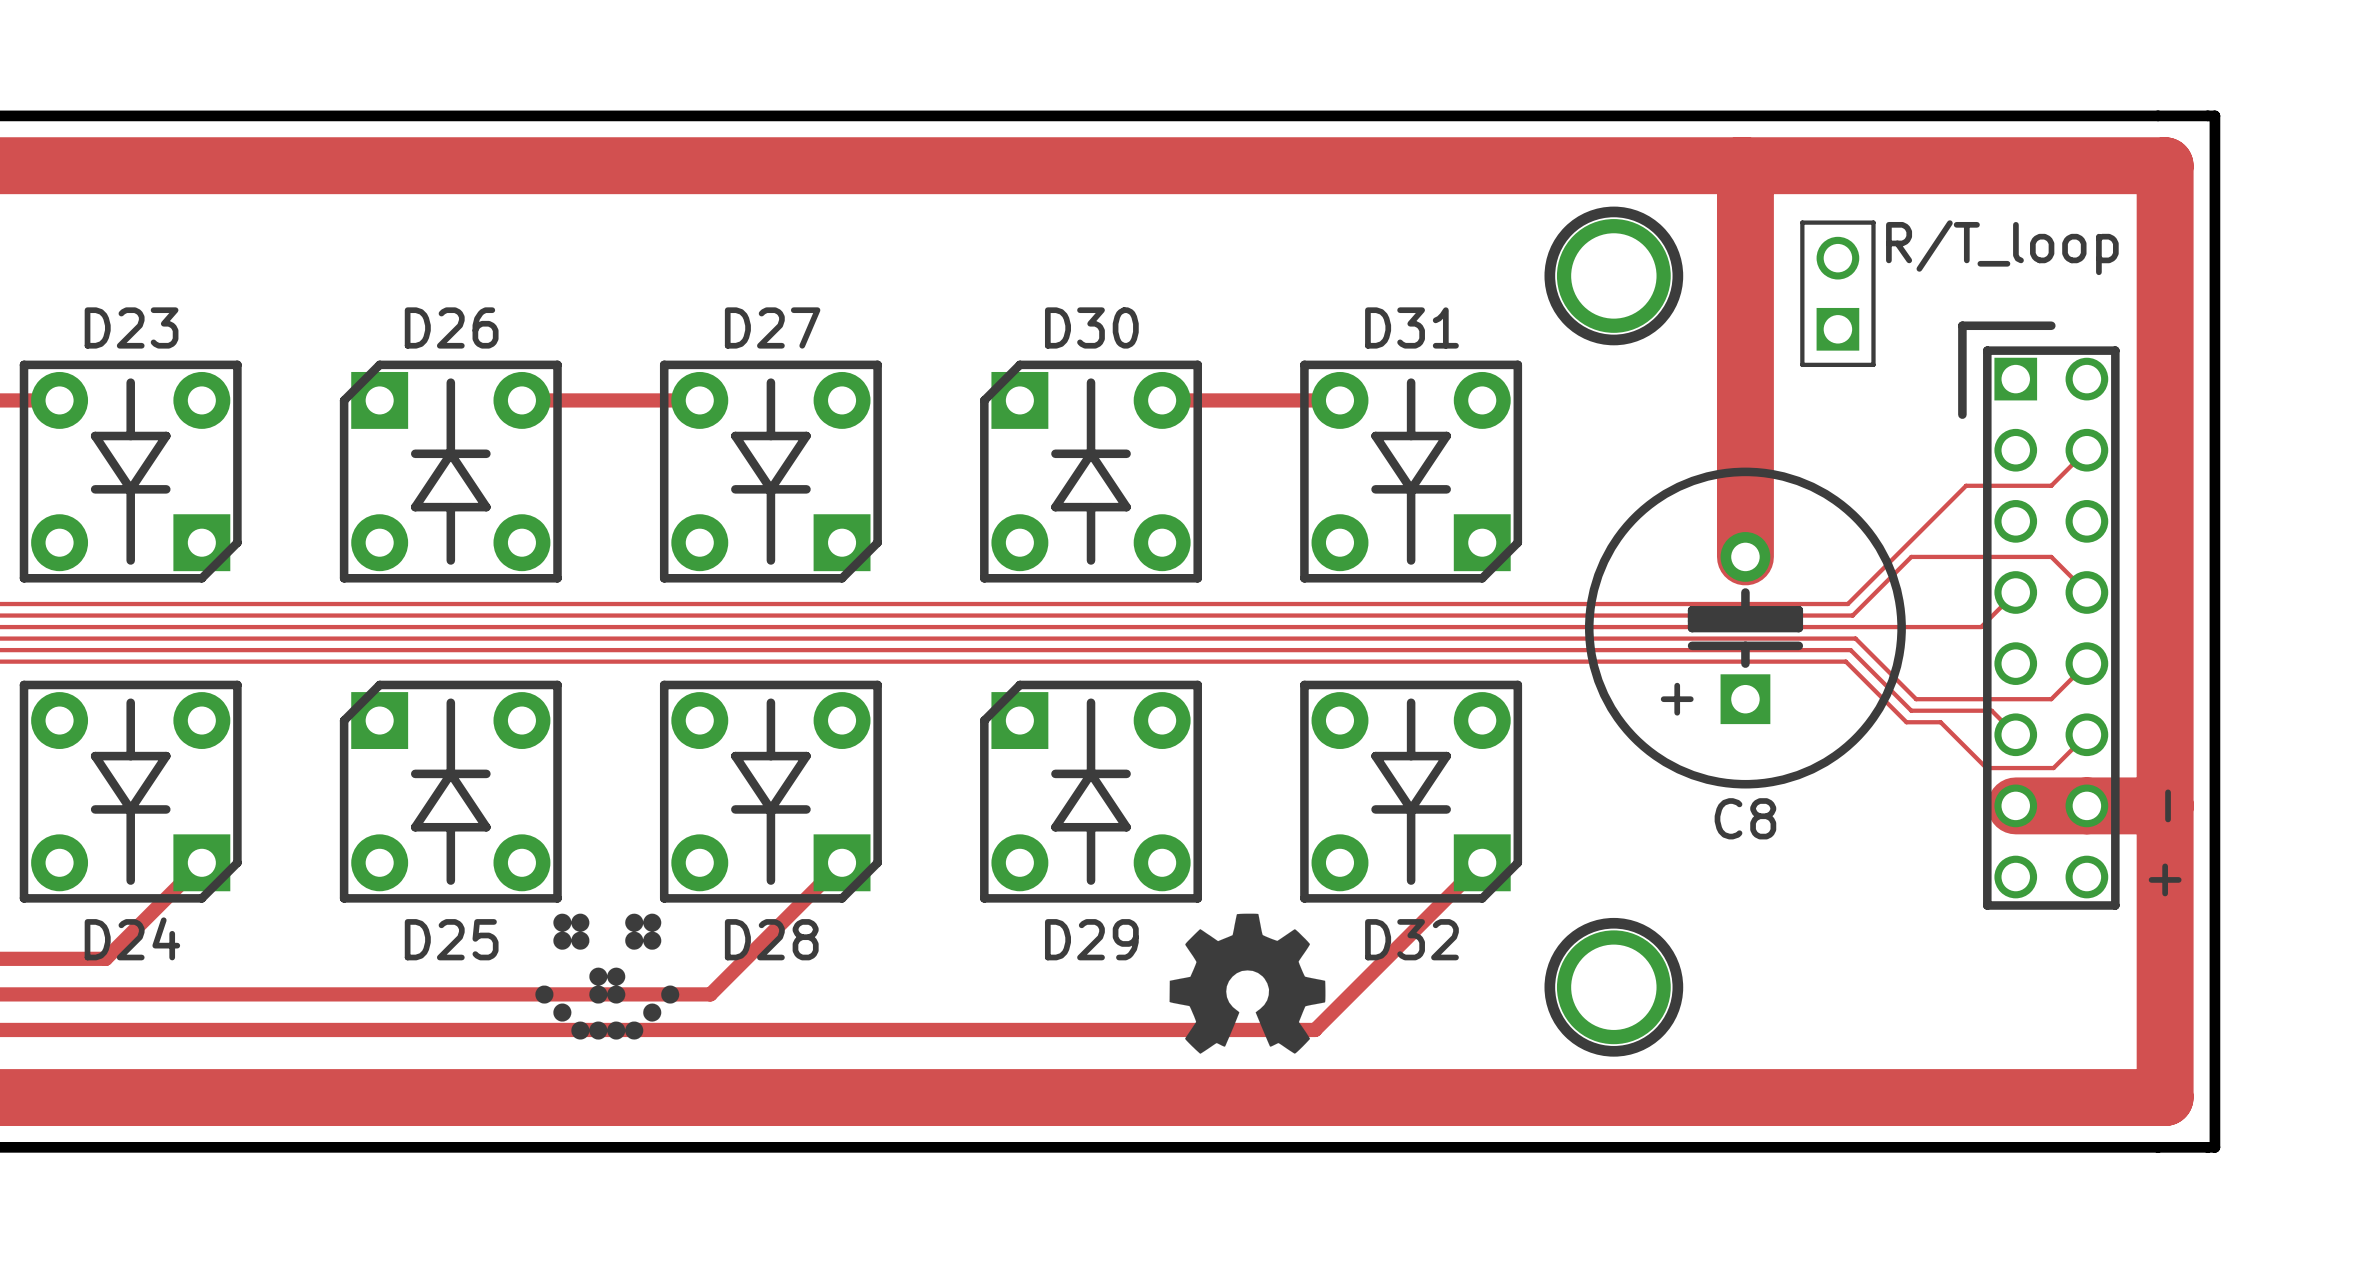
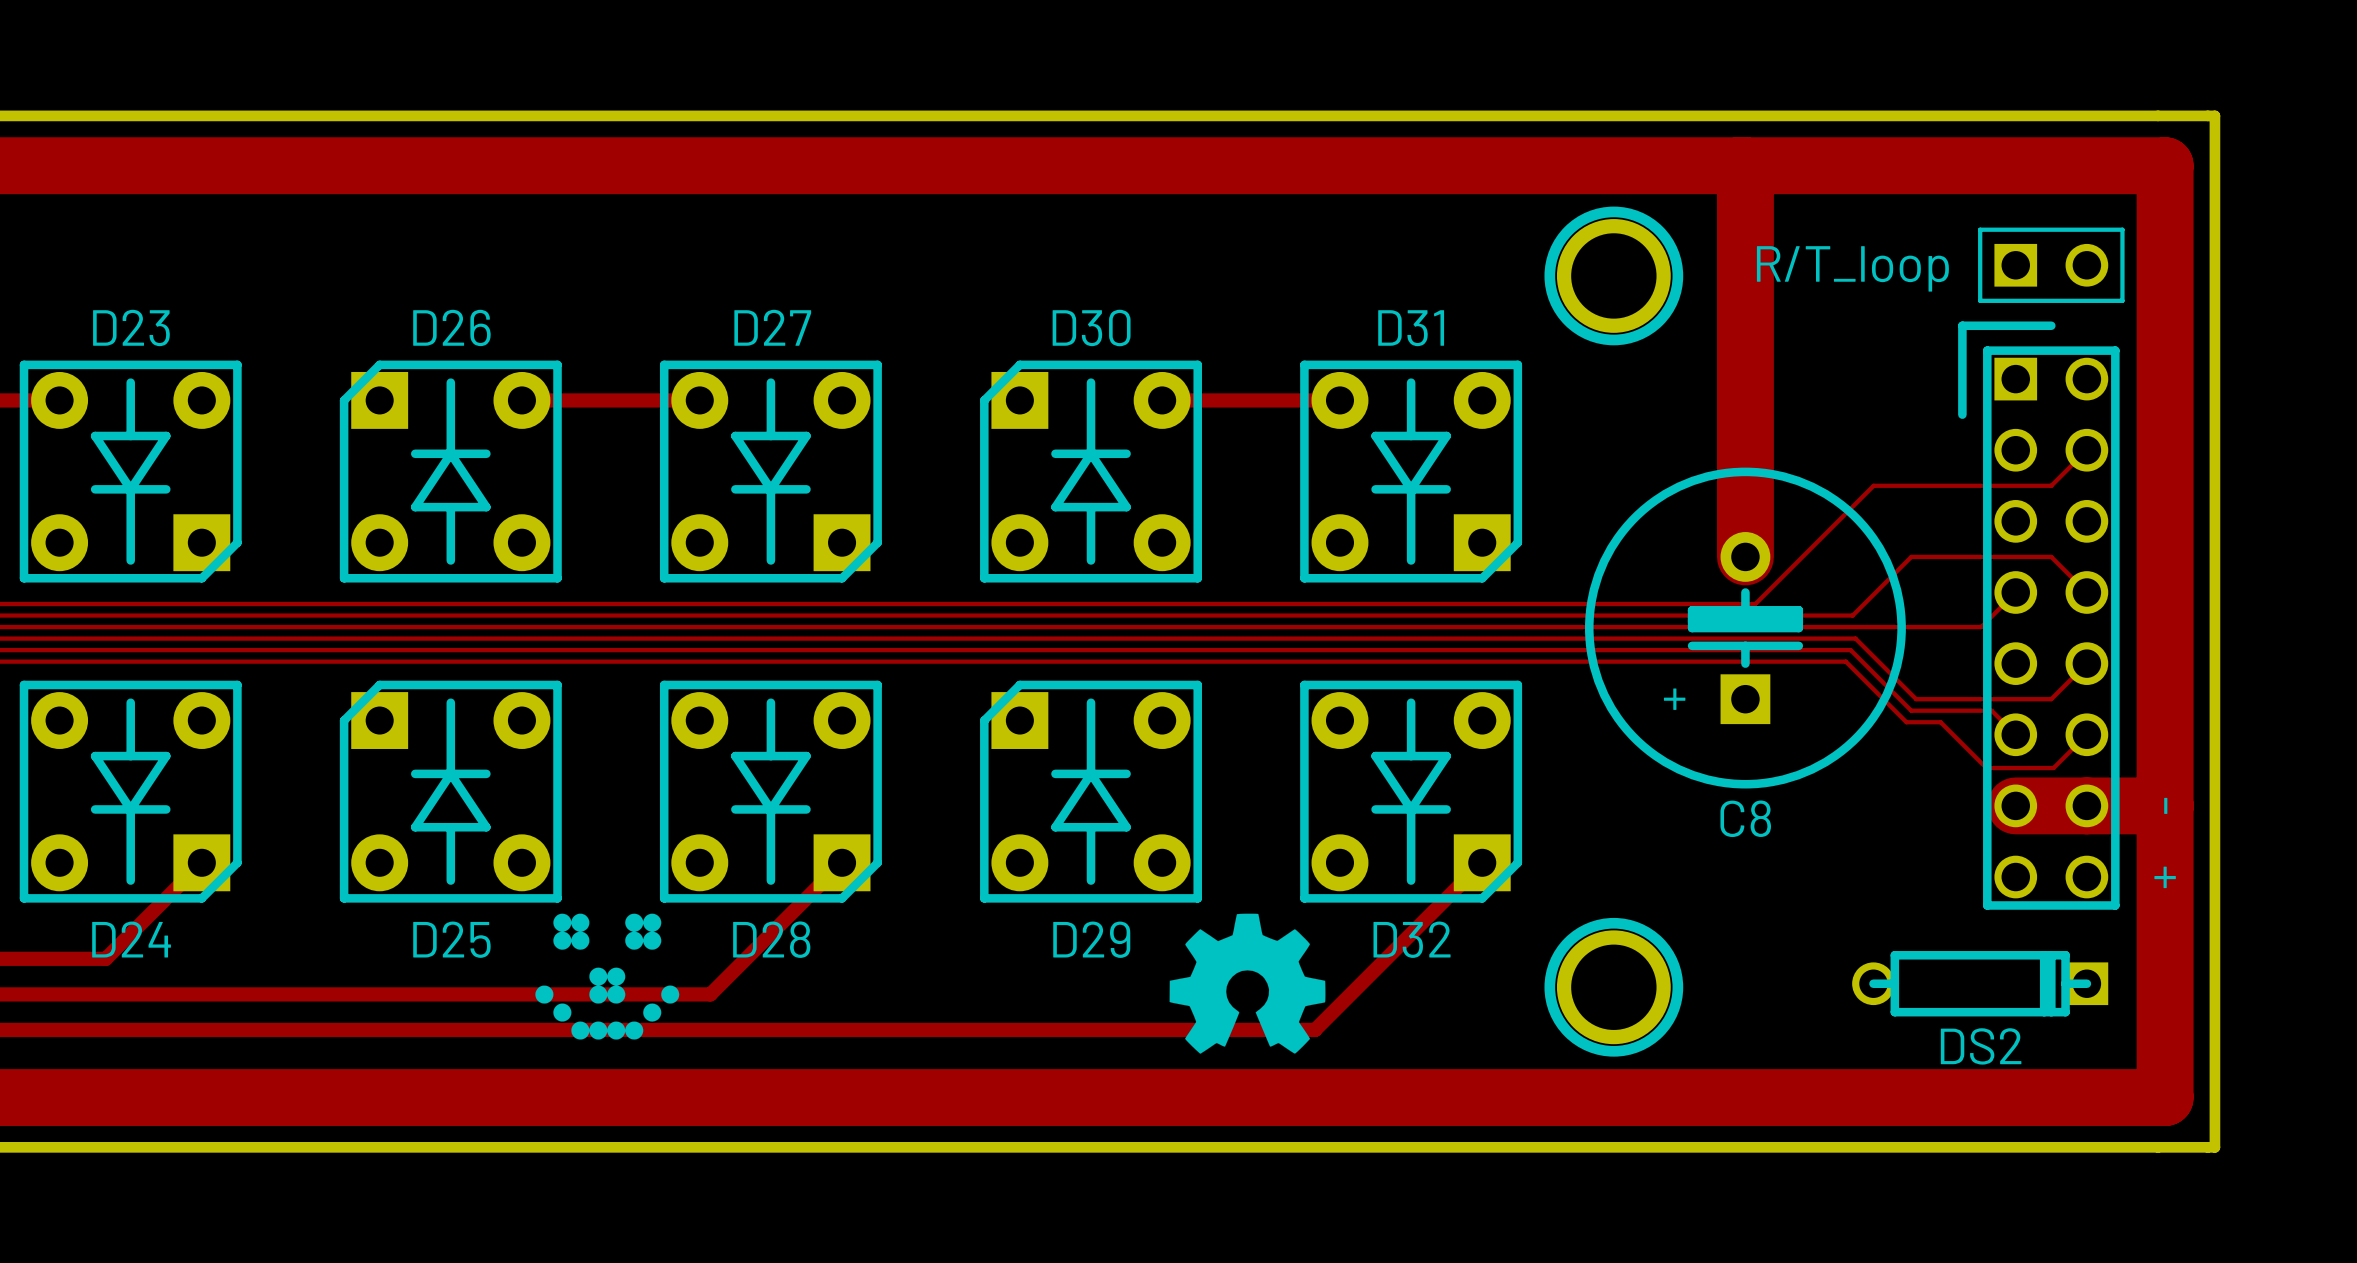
part value position: R/T_loop (2002, 247) -> R/T_loop (1852, 268)
part rotation: 0° (1837, 293) -> 90° clockwise (2051, 265)
part position: (1837, 293) -> (2051, 265)
track: (1966, 485) (1847, 604) (1755, 604) -> (1966, 485) (1873, 485) (1755, 604)
DS2: none -> (1980, 983)

